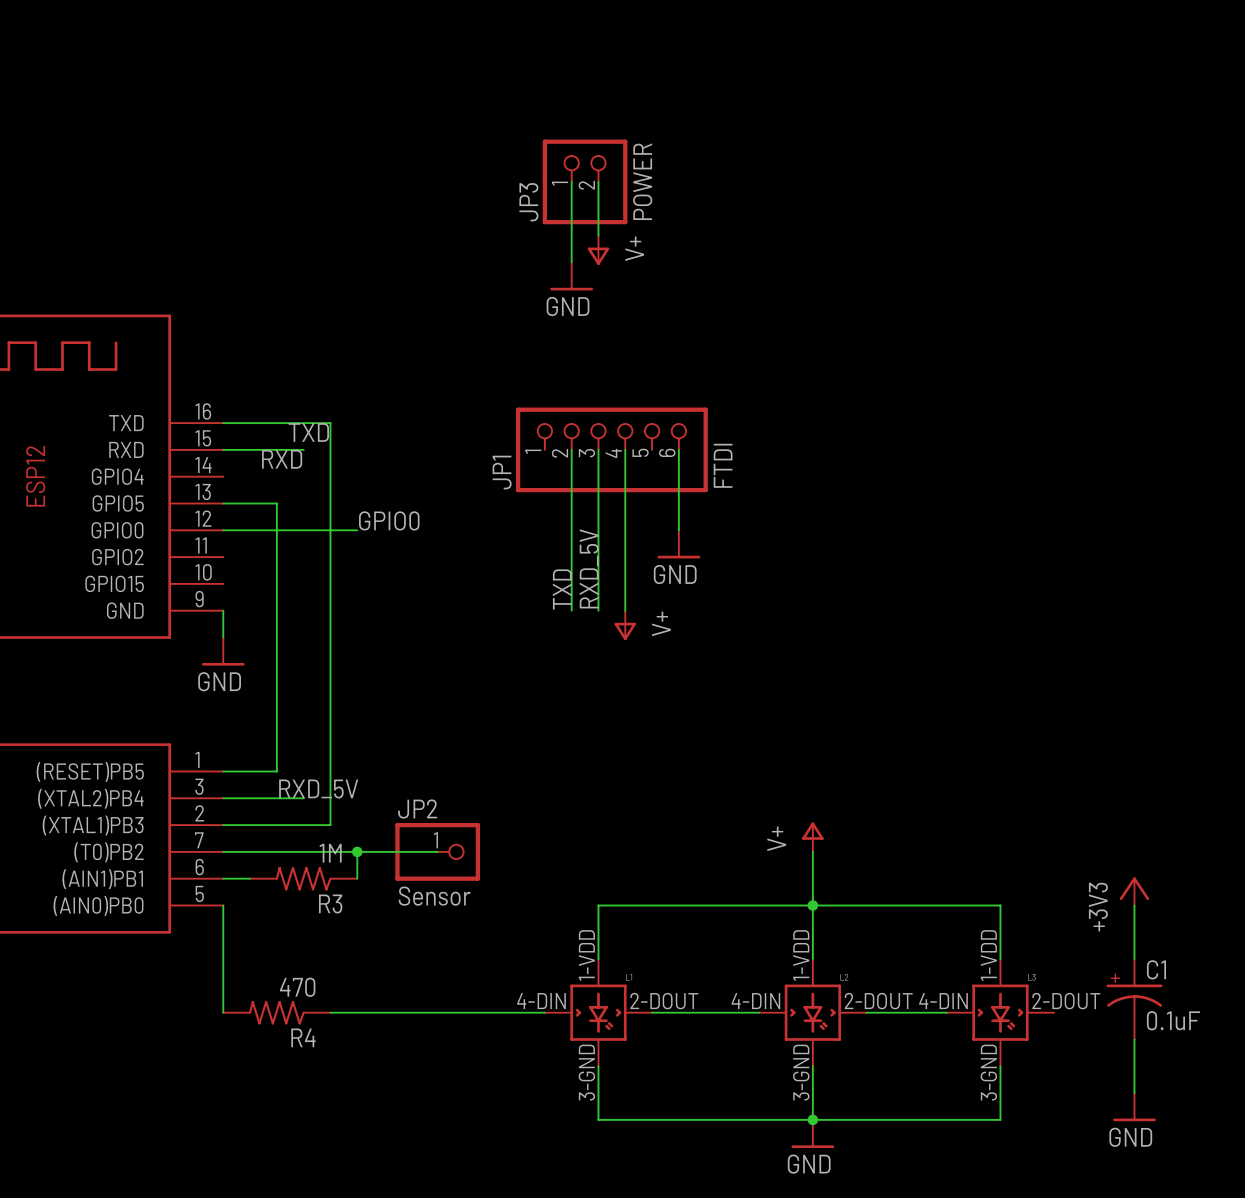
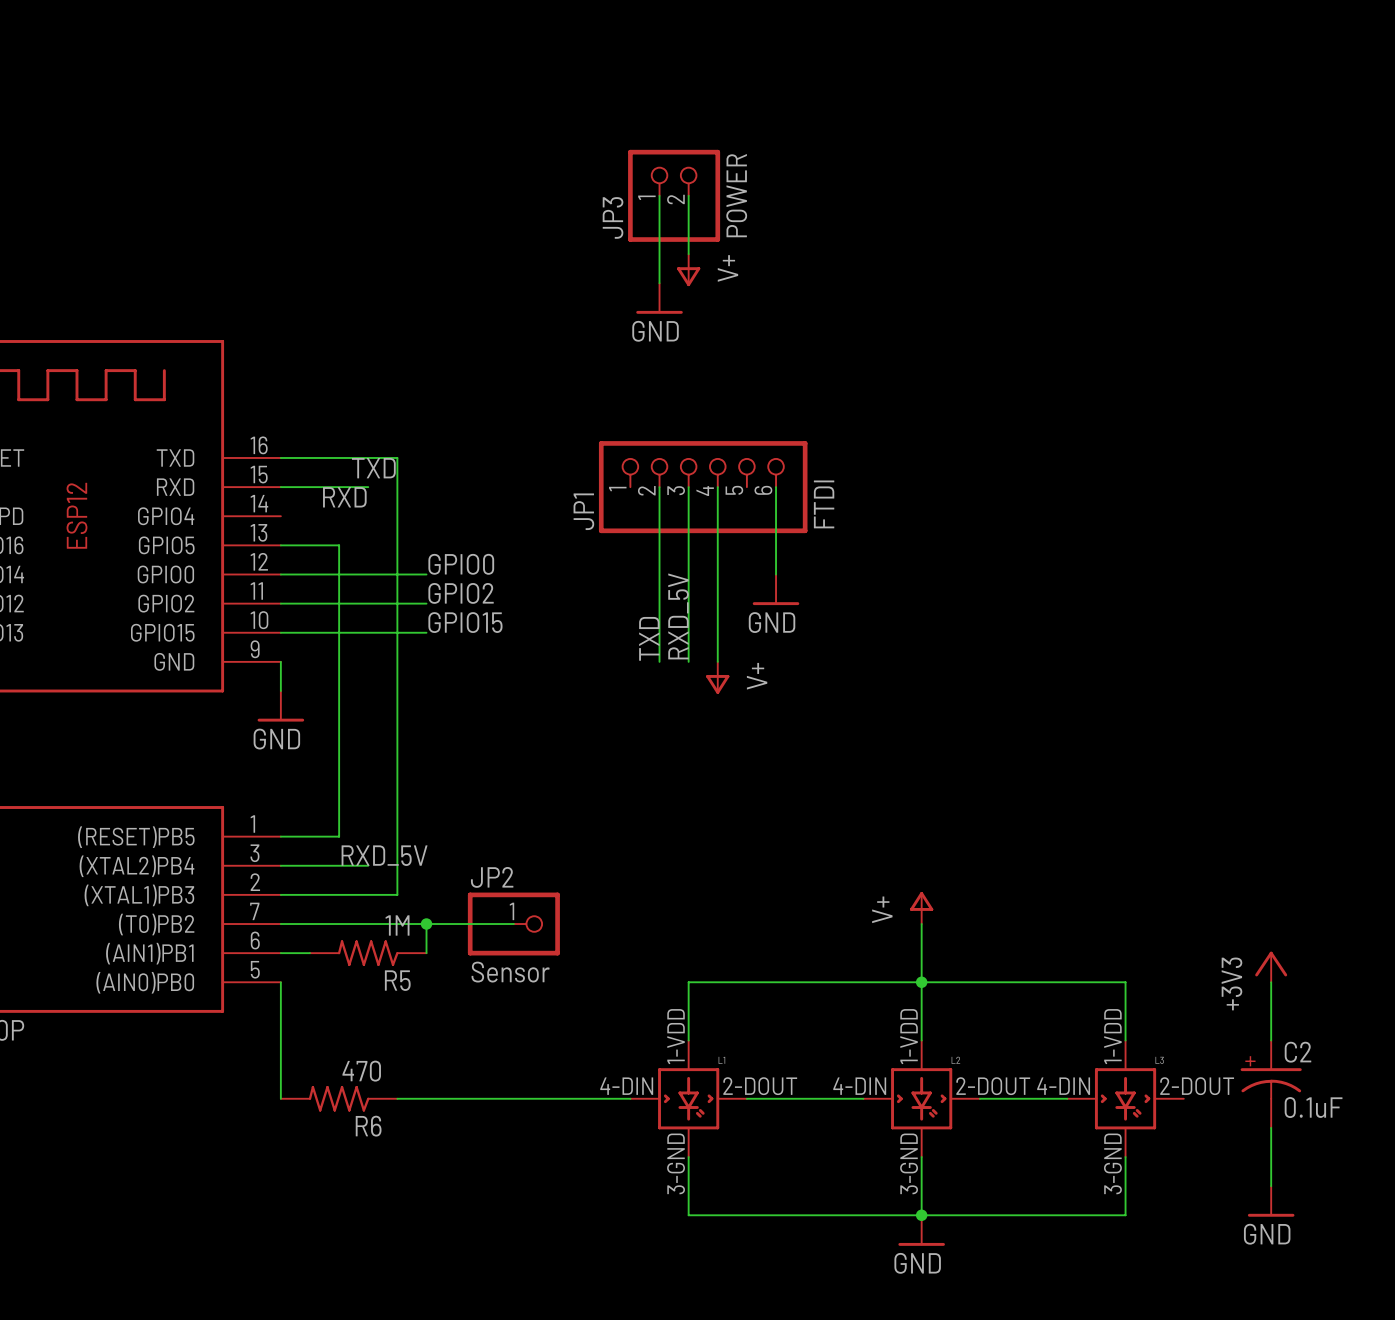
label: none -> GPIO2 (461, 593)
wire: none -> (280, 603) (426, 603)
label: none -> GPIO15 (465, 622)
wire: none -> (280, 632) (426, 632)
R3 name: R3 (330, 903) -> R5 (397, 980)
C1 name: C1 (1156, 969) -> C2 (1297, 1052)
R4 name: R4 (303, 1037) -> R6 (368, 1126)

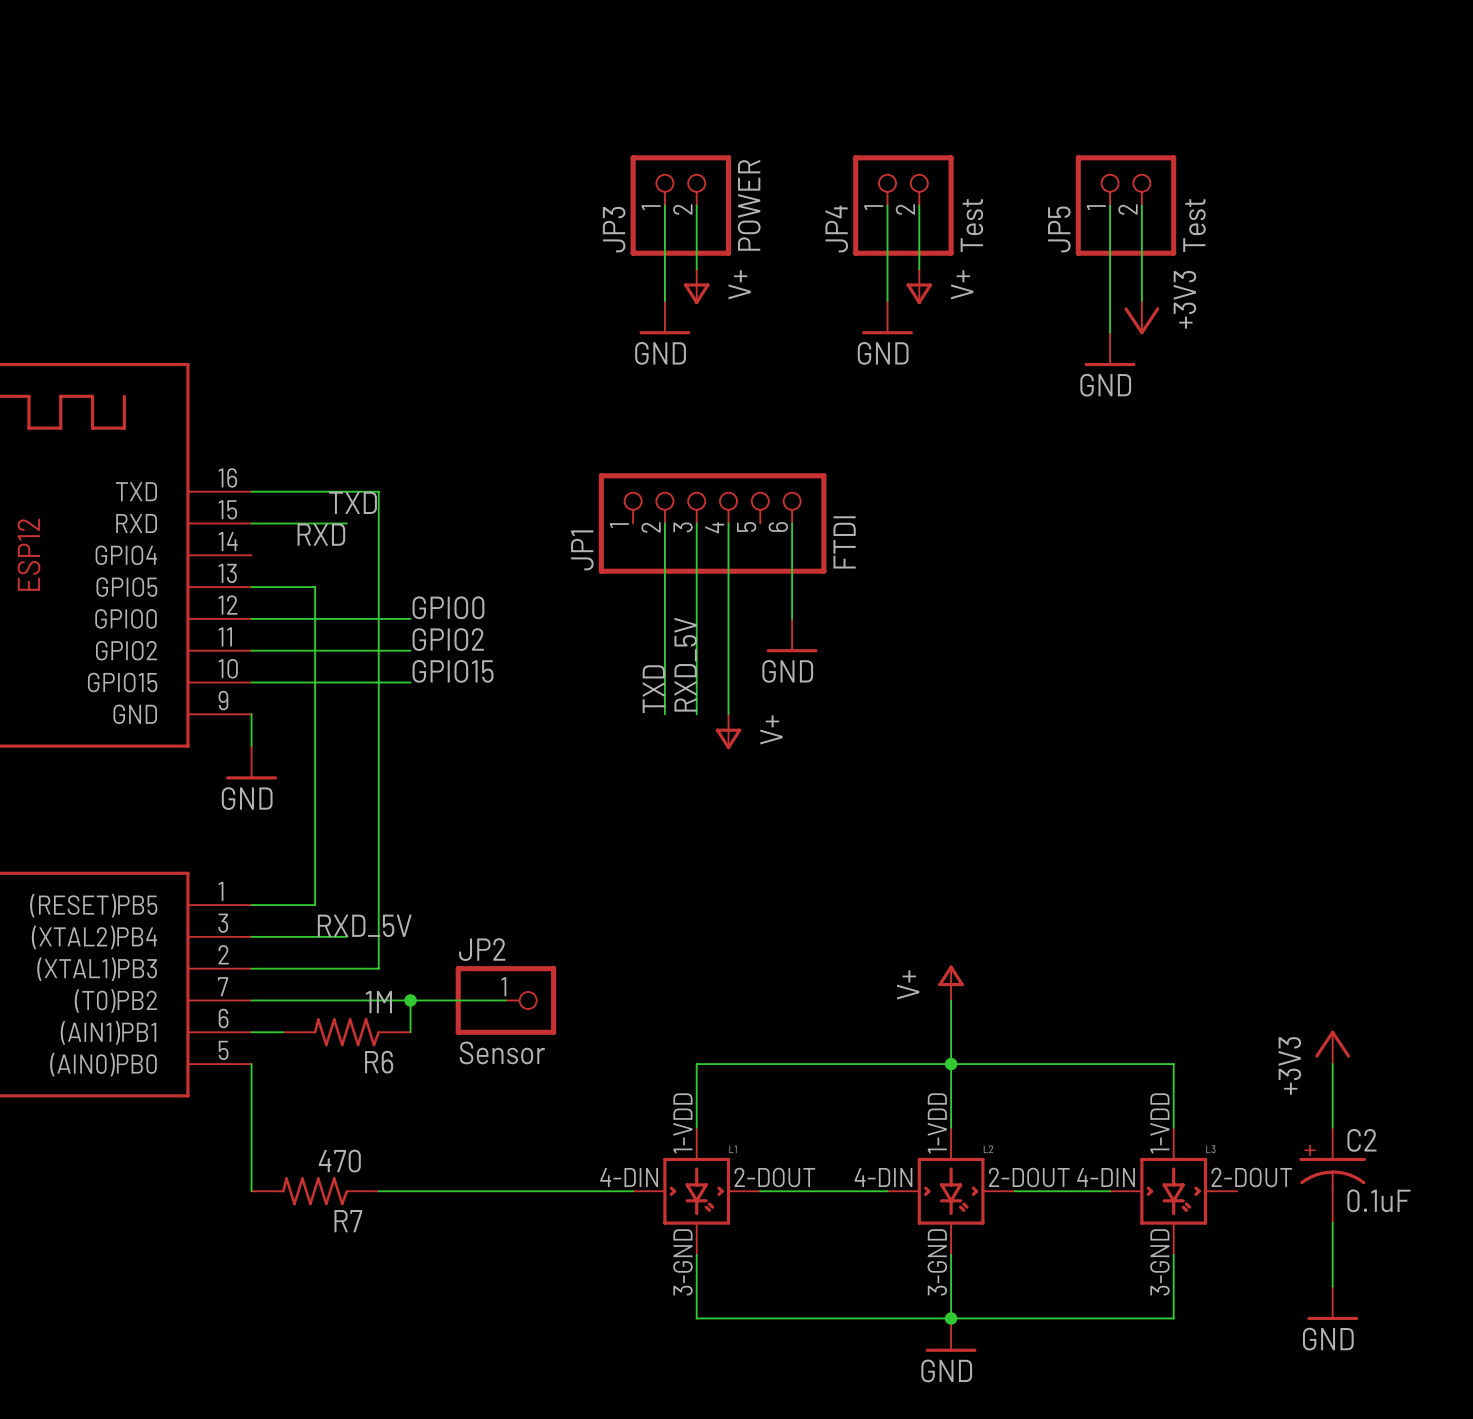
wire: none -> (887, 205) (887, 300)
JP4: none -> Test (903, 205)
wire: none -> (919, 205) (919, 269)
wire: none -> (1110, 205) (1110, 332)
JP5: none -> Test (1125, 205)
wire: none -> (1141, 205) (1141, 300)
power symbol: none -> V+ (919, 286)
power symbol: none -> GND (887, 317)
power symbol: none -> +3V3 (1141, 317)
power symbol: none -> GND (1110, 349)
R5 name: R5 (397, 980) -> R6 (379, 1062)
R6 name: R6 (368, 1126) -> R7 (348, 1221)

